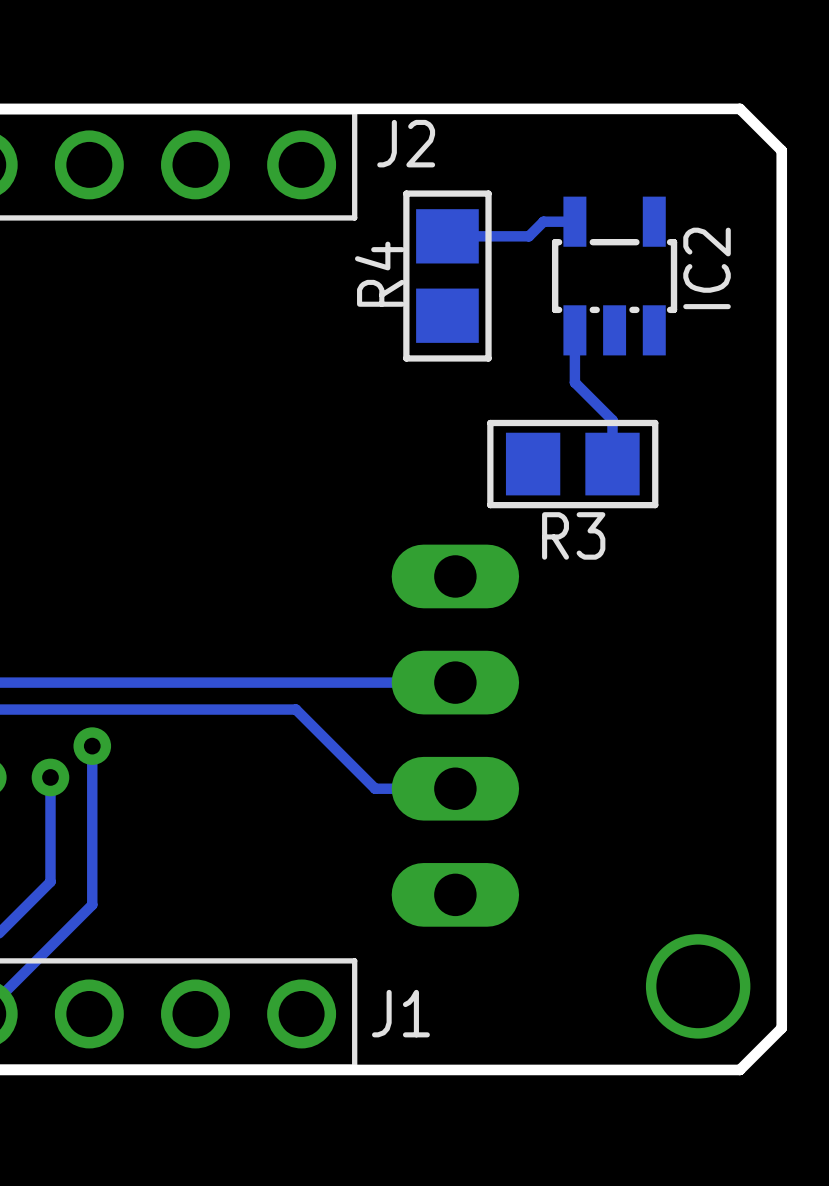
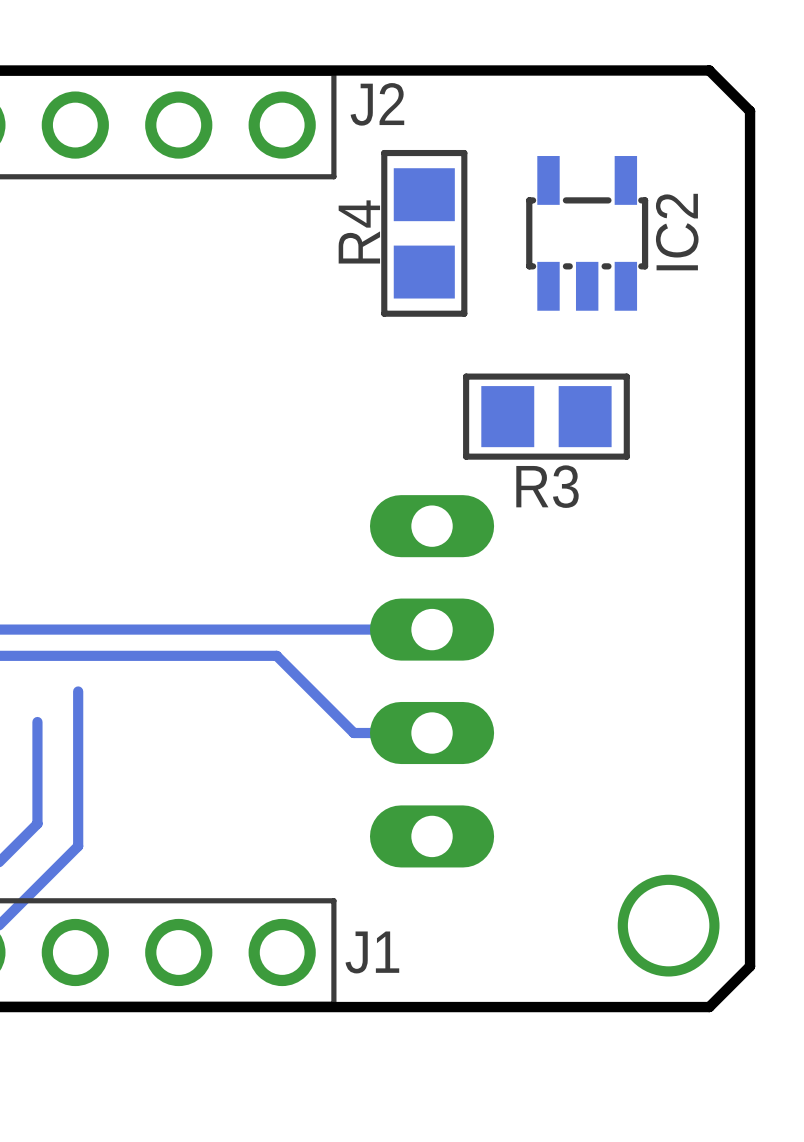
track: (574, 221) (543, 221) (528, 236) (447, 236) -> none
track: (574, 330) (574, 382) (612, 420) (612, 464) -> none
via: (92, 746) -> none
via: (50, 777) -> none

